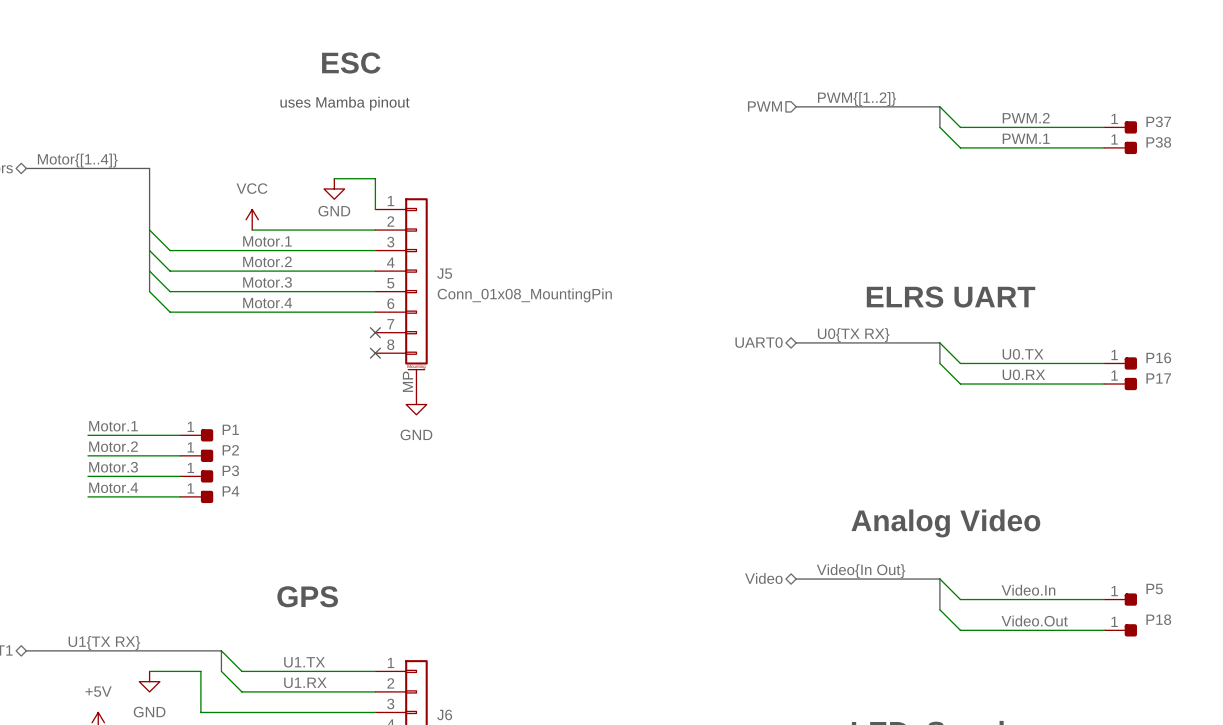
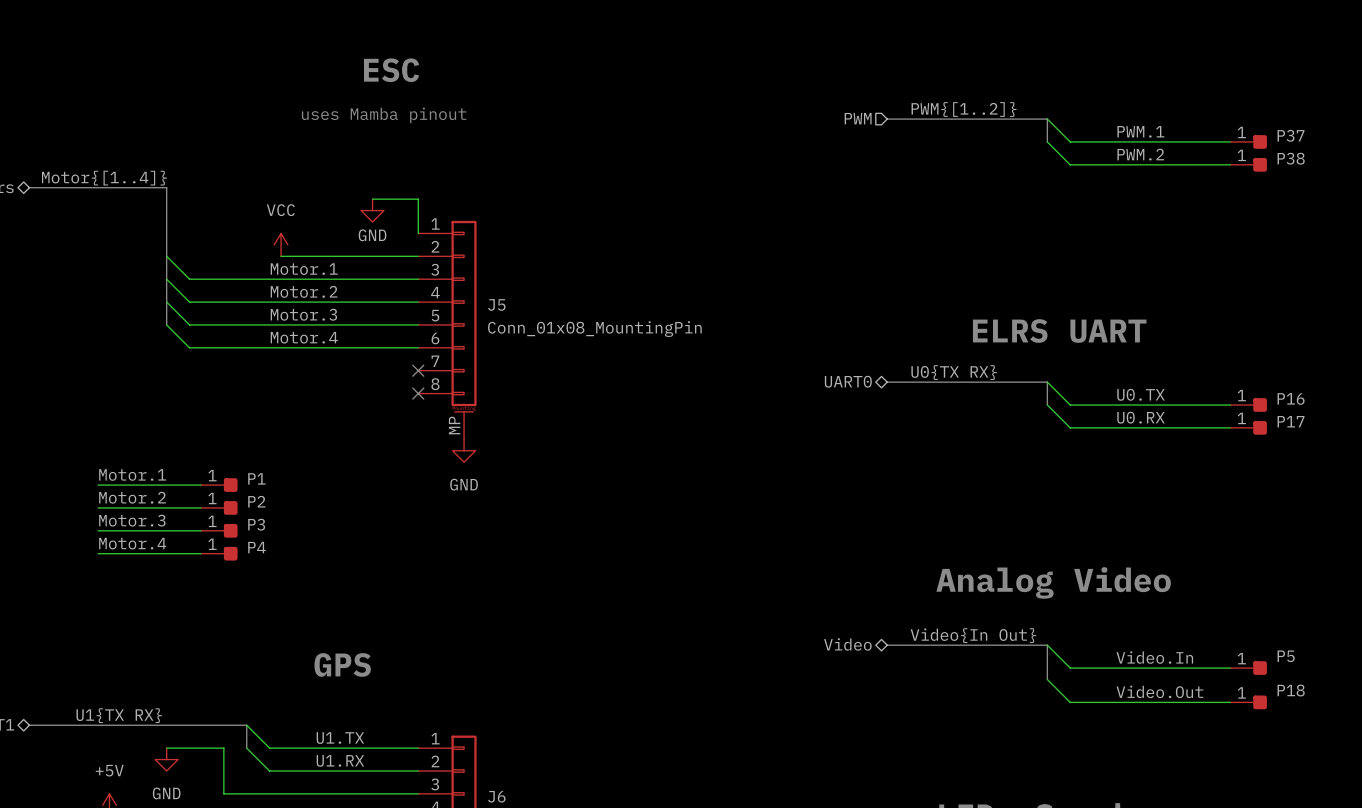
label: PWM.2 (1026, 118) -> PWM.1 (1140, 131)
label: PWM.1 (1026, 138) -> PWM.2 (1140, 154)

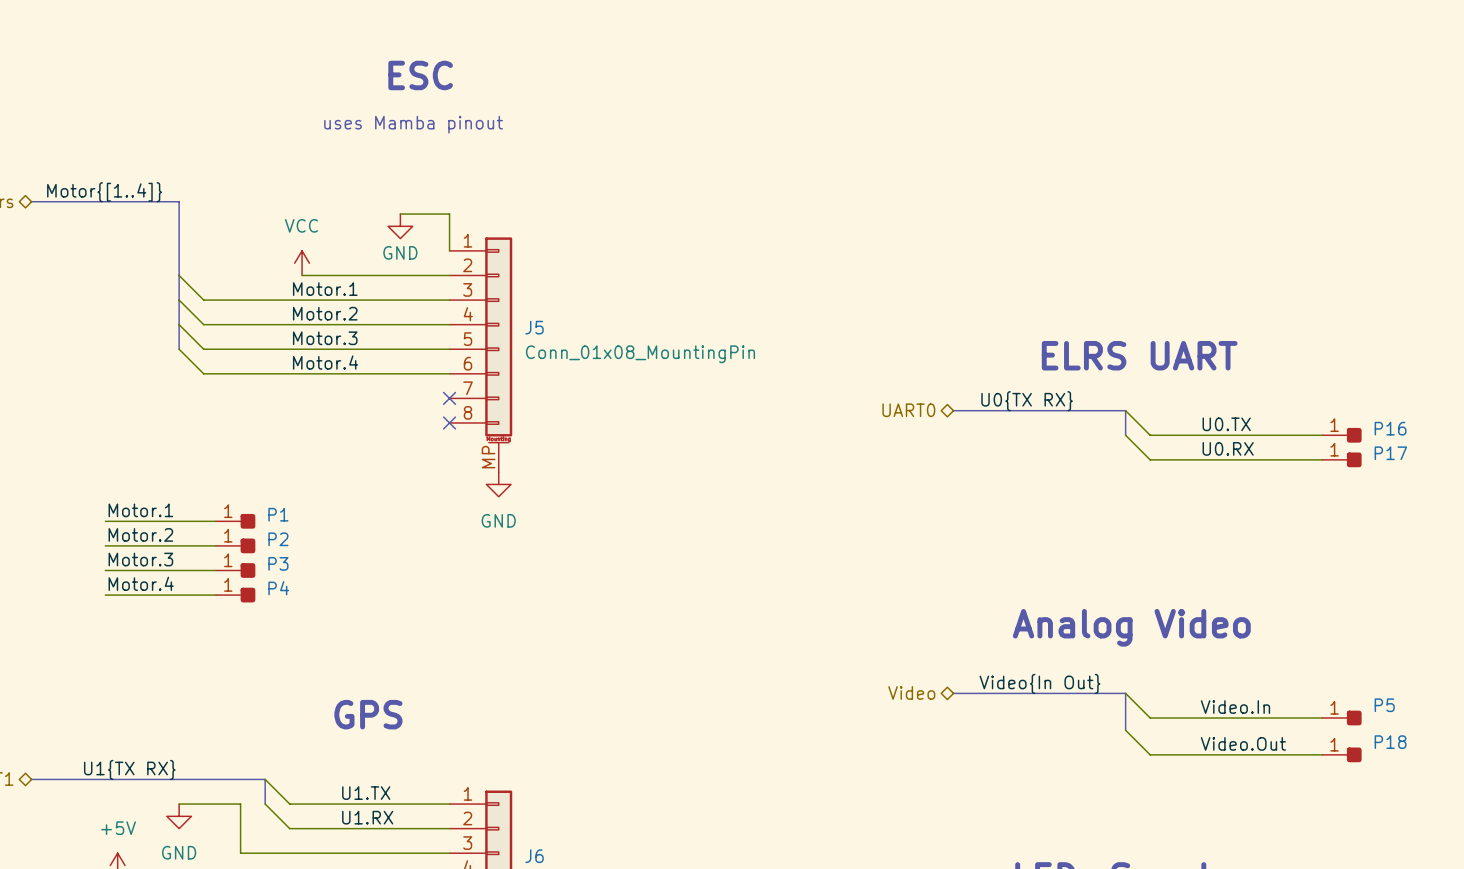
label: PWM{[1..2]} (964, 109) -> none
hierarchical label: PWM (858, 118) -> none
bus: (887, 119) (1047, 119) (1047, 141) -> none
wire: (1047, 119) (1070, 141) (1230, 141) -> none
label: PWM.1 (1140, 131) -> none
wire: (1047, 141) (1070, 164) (1230, 164) -> none
P37: (1248, 141) -> none
label: PWM.2 (1140, 154) -> none
P38: (1248, 164) -> none

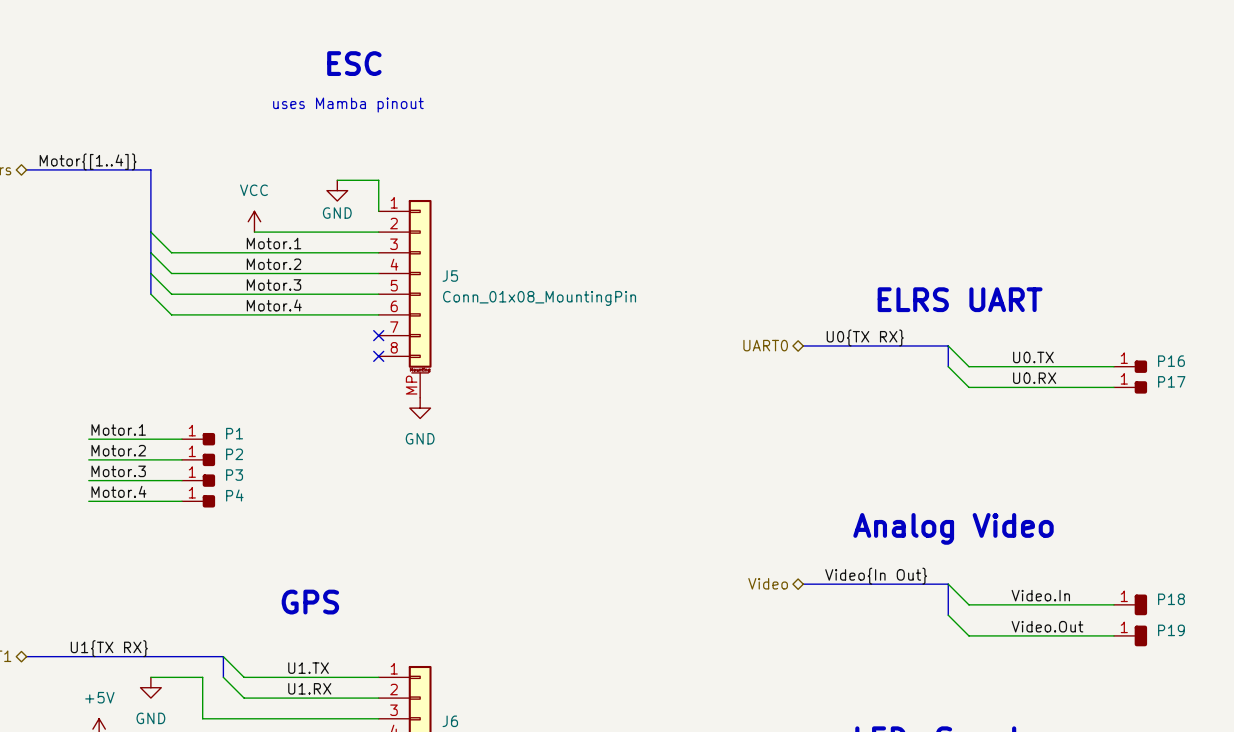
P5: (1341, 718) -> none
P18 symbol: [1322, 747, 1362, 763] -> [1113, 594, 1148, 616]
P19: none -> (1130, 635)

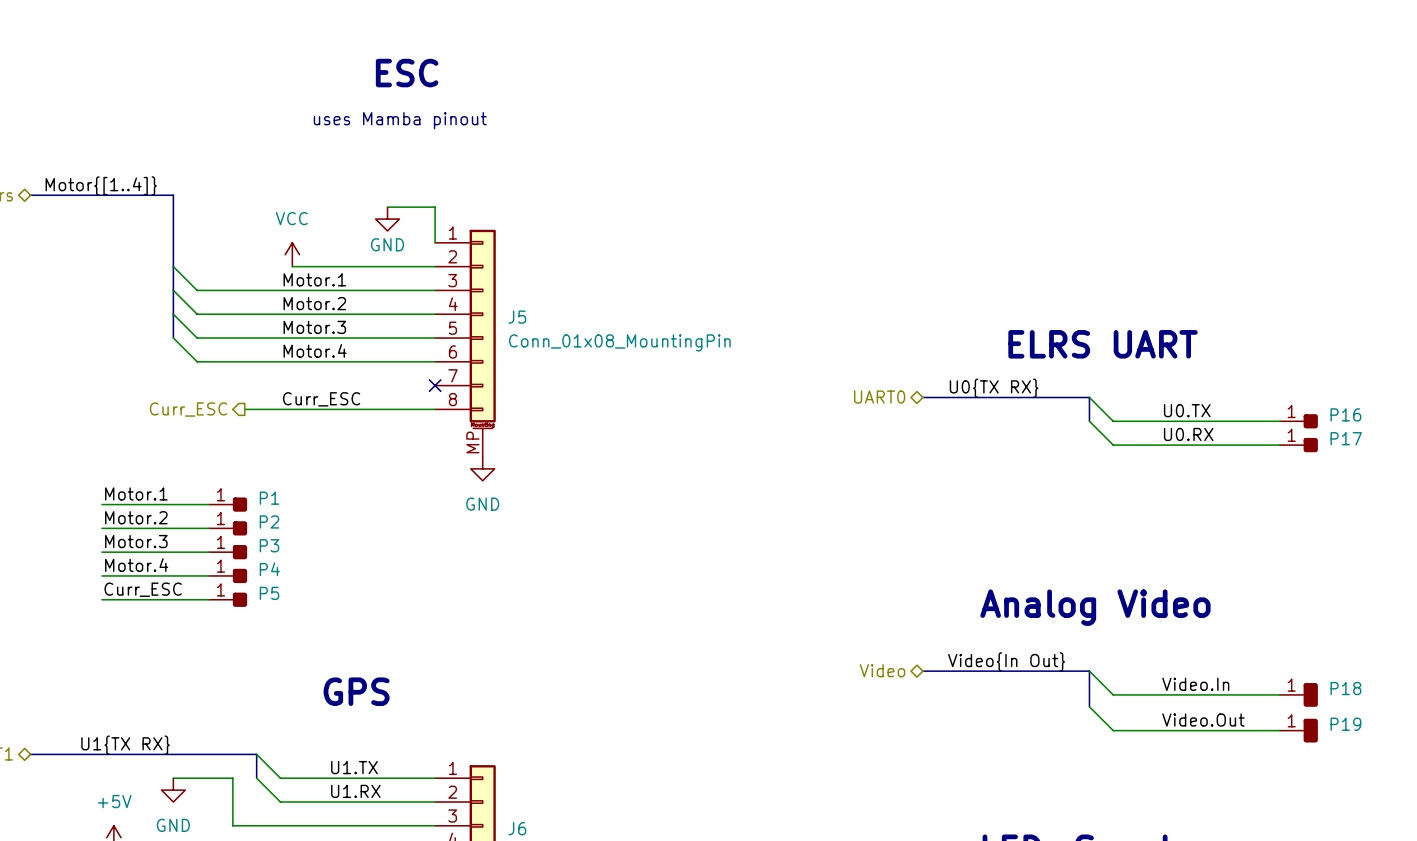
label: none -> Curr_ESC (321, 399)
hierarchical label: none -> Curr_ESC (188, 409)
wire: none -> (244, 409) (435, 409)
no-connect mark: (378, 356) -> none
label: none -> Curr_ESC (143, 589)
wire: none -> (101, 599) (209, 599)
P5: none -> (228, 599)

